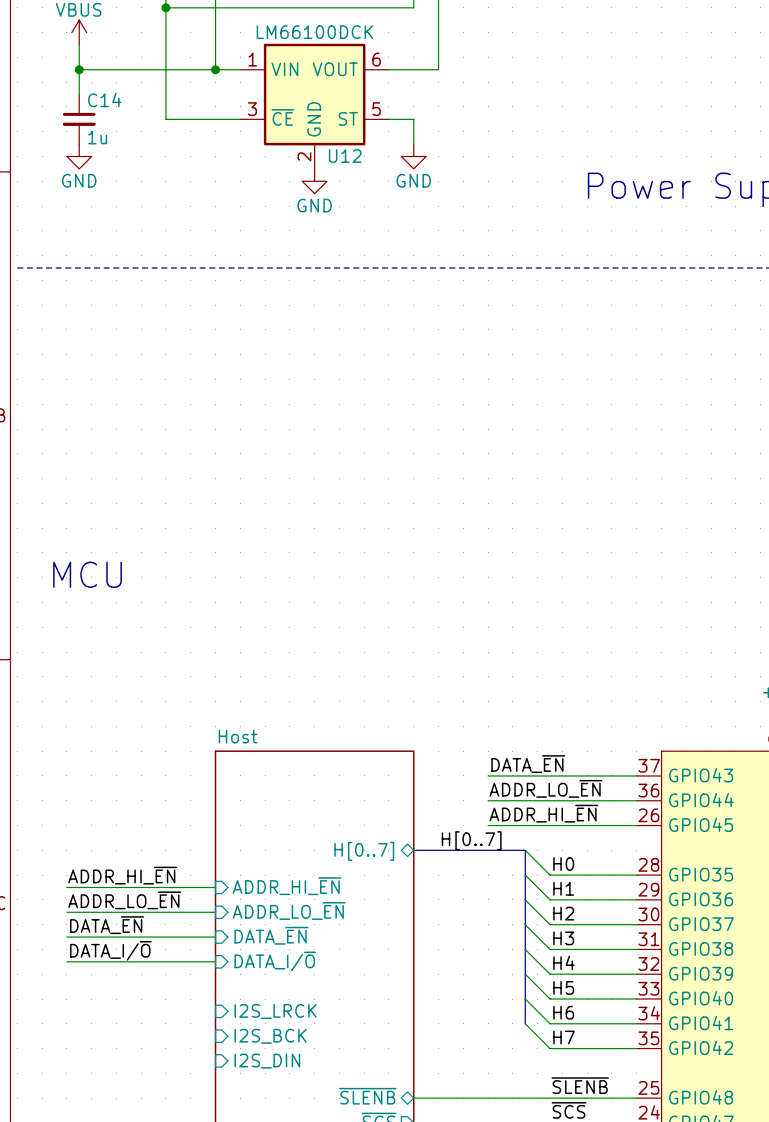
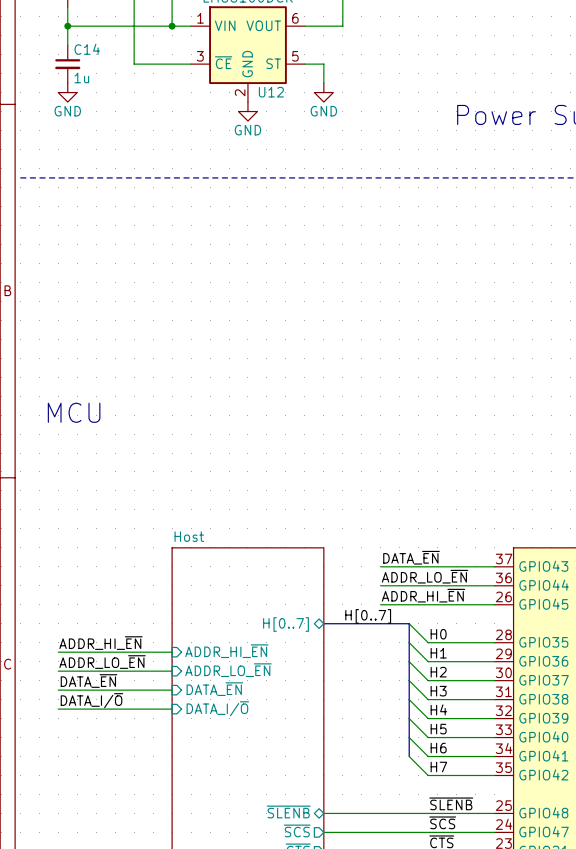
sheet pin: I2S_LRCK (275, 1011) -> none
sheet pin: I2S_BCK (270, 1036) -> none
sheet pin: I2S_DIN (267, 1061) -> none

